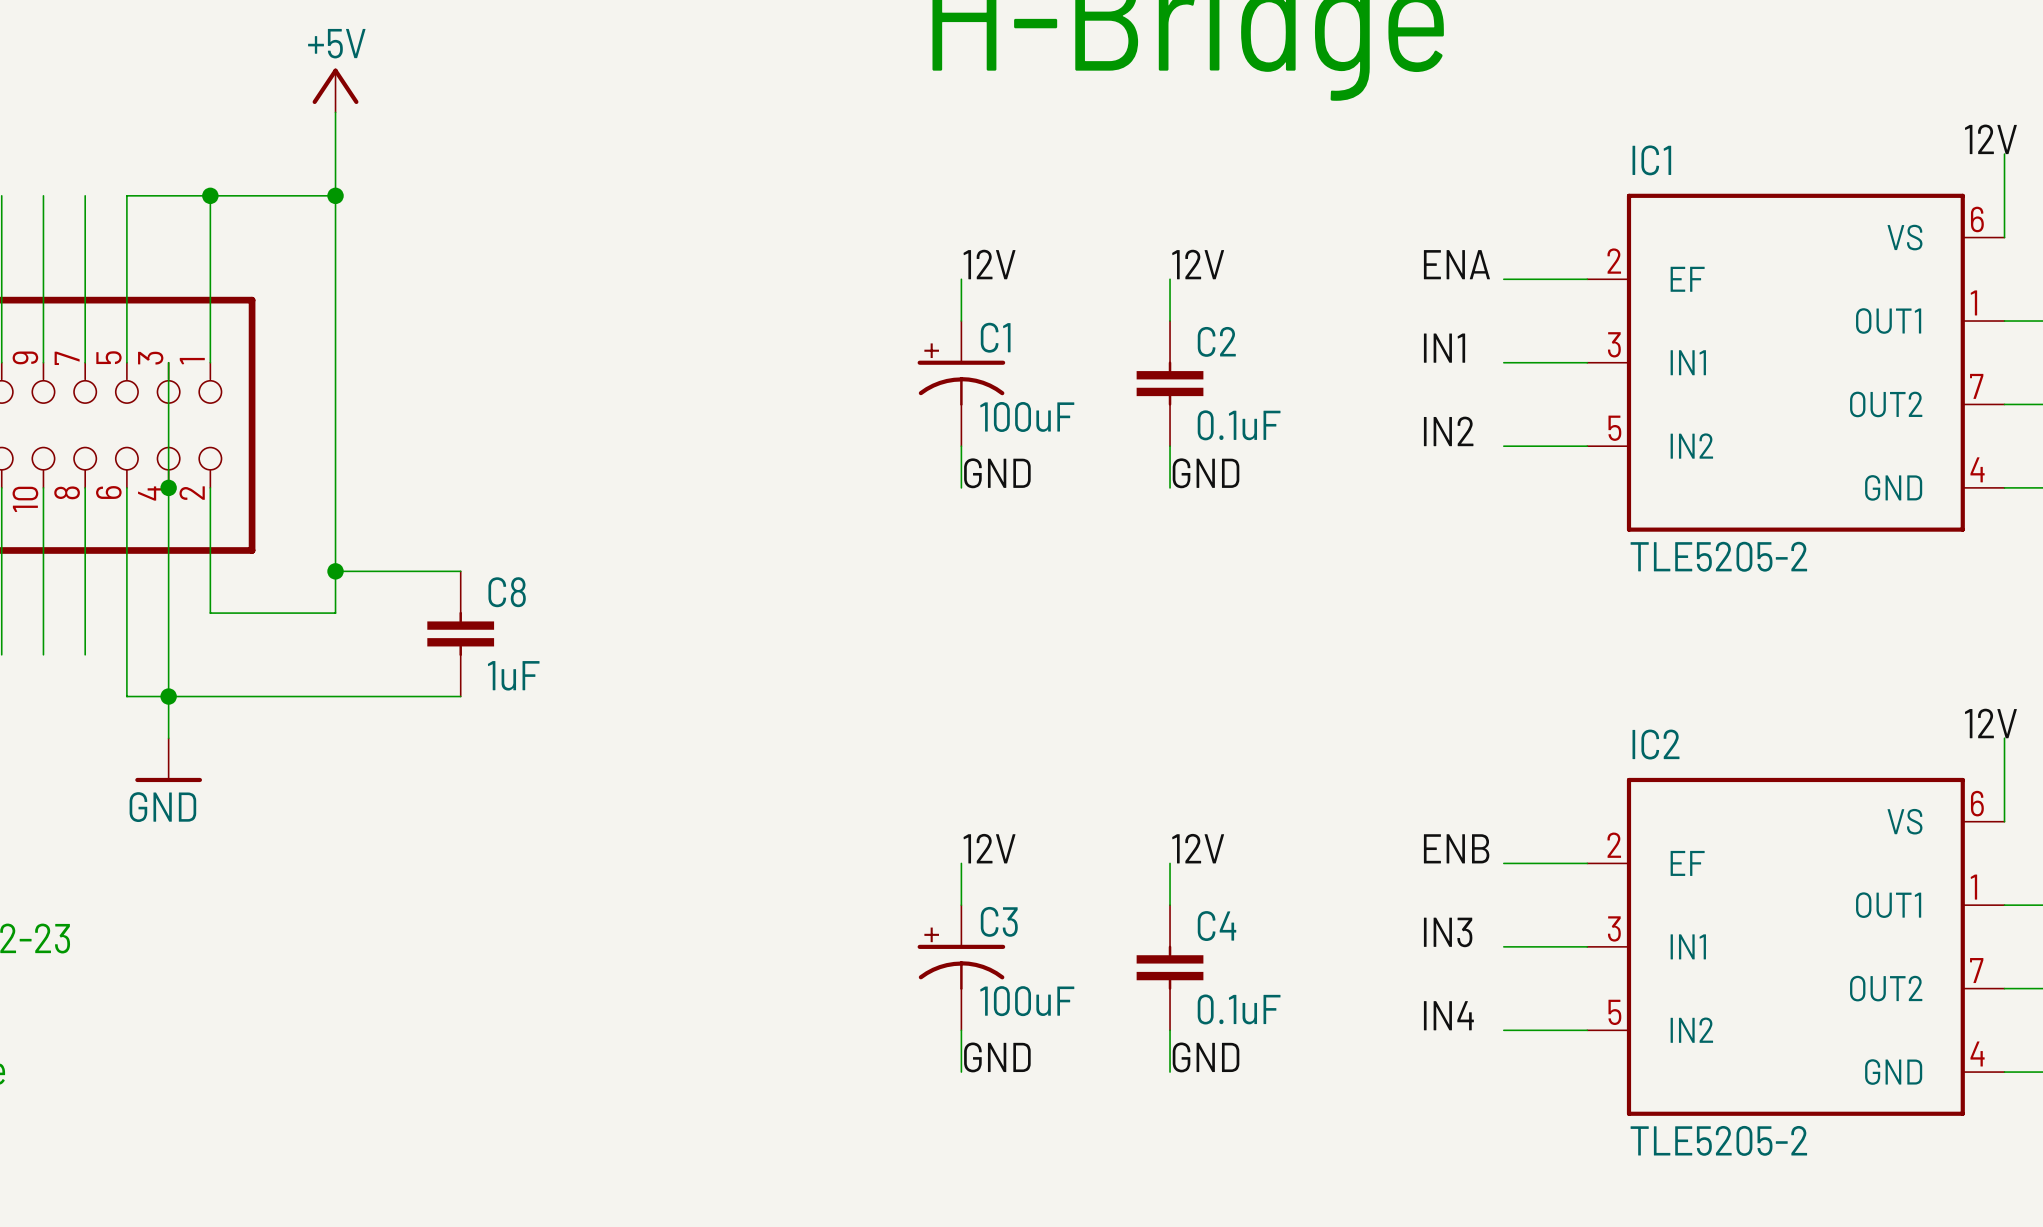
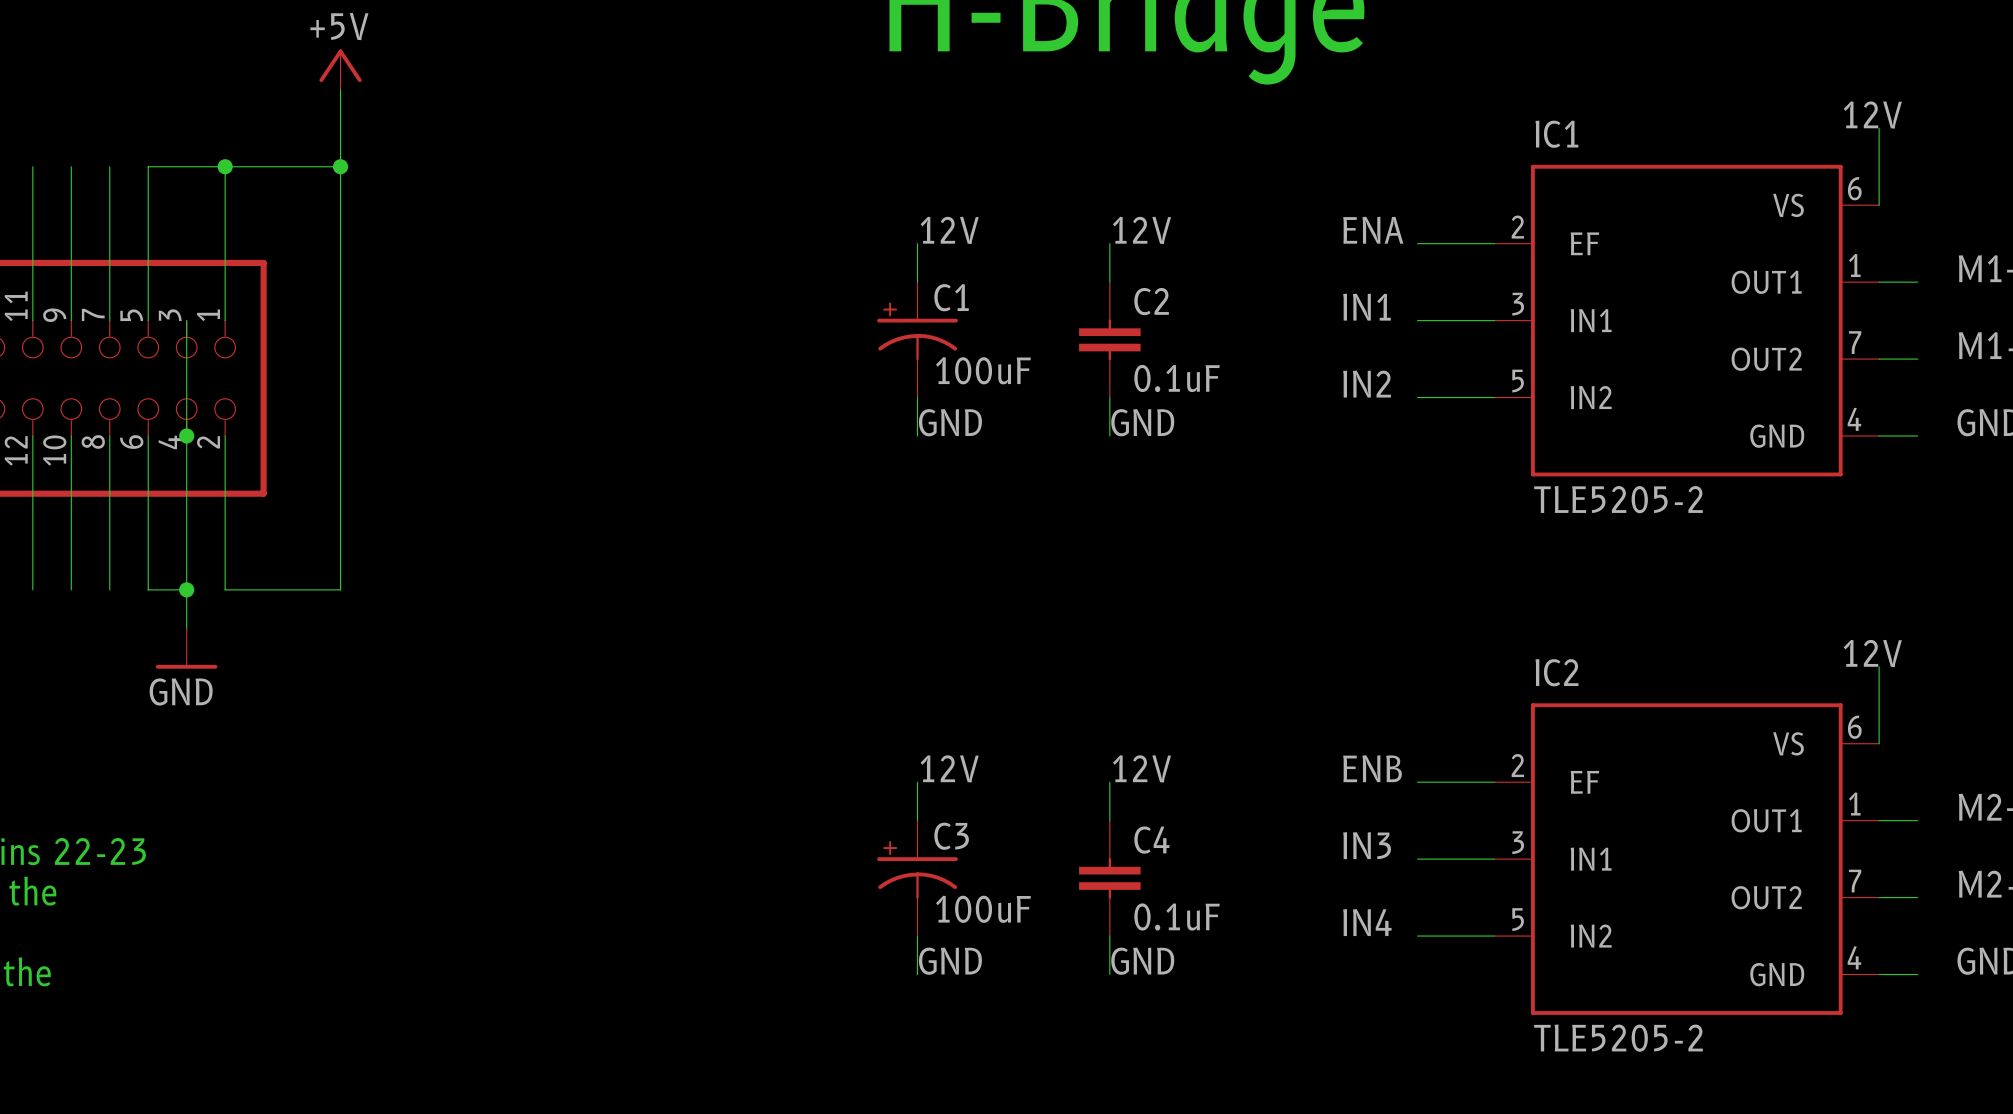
wire: (335, 571) (460, 571) -> none
junction: (335, 571) -> none
wire: (210, 613) (335, 613) -> (225, 551) (225, 589) (340, 589) (340, 551)
C8: 1uF (460, 633) -> none
wire: (126, 654) (126, 696) (460, 696) -> (148, 589) (186, 589)
junction position: (168, 696) -> (186, 589)
power symbol position: GND (168, 760) -> GND (186, 648)

